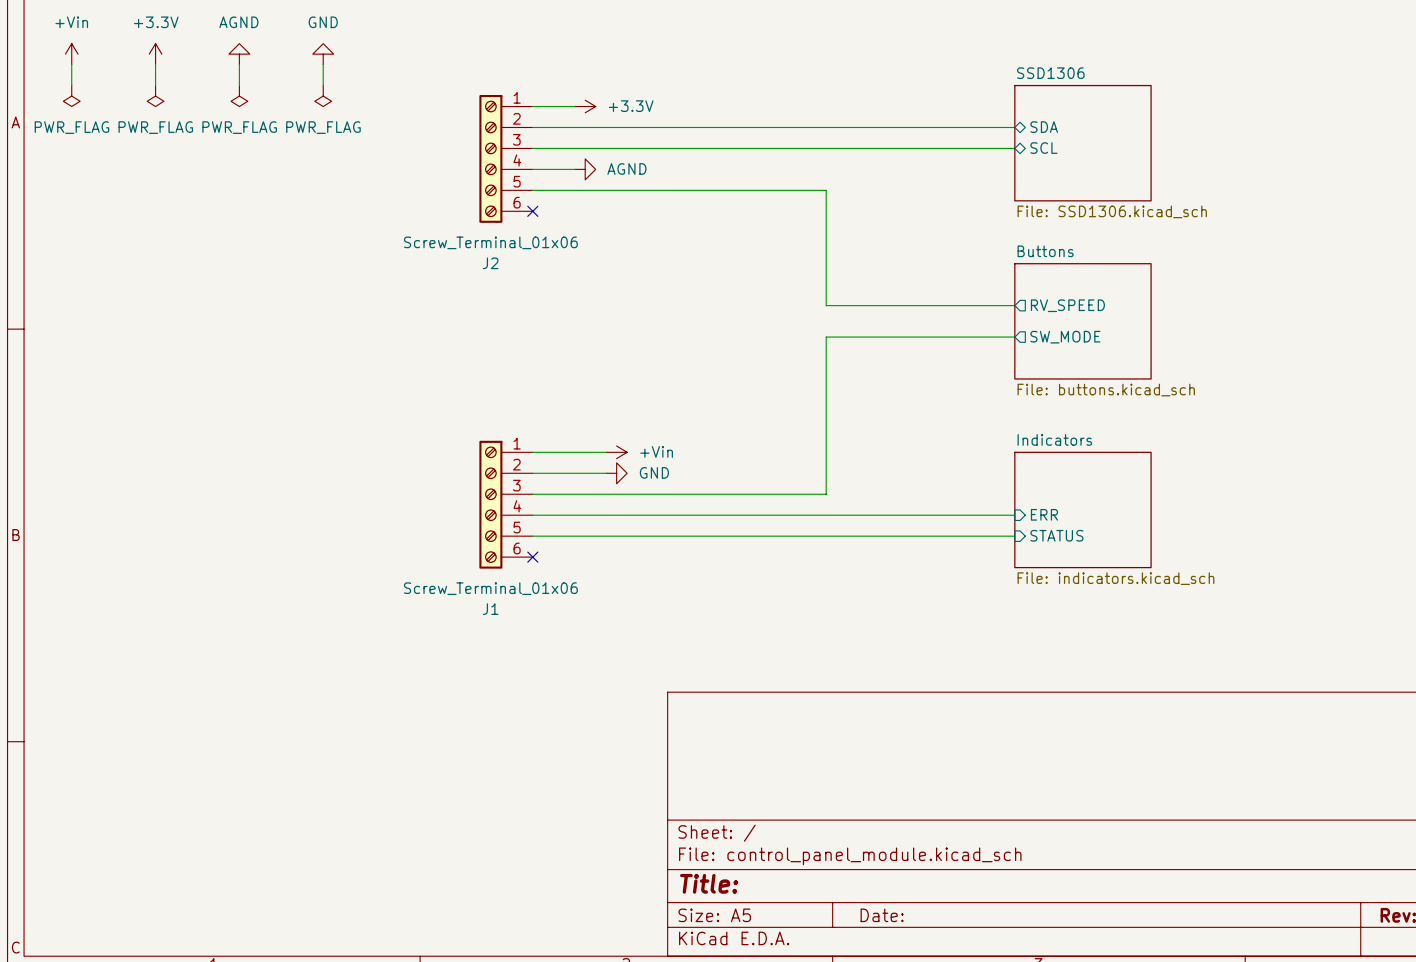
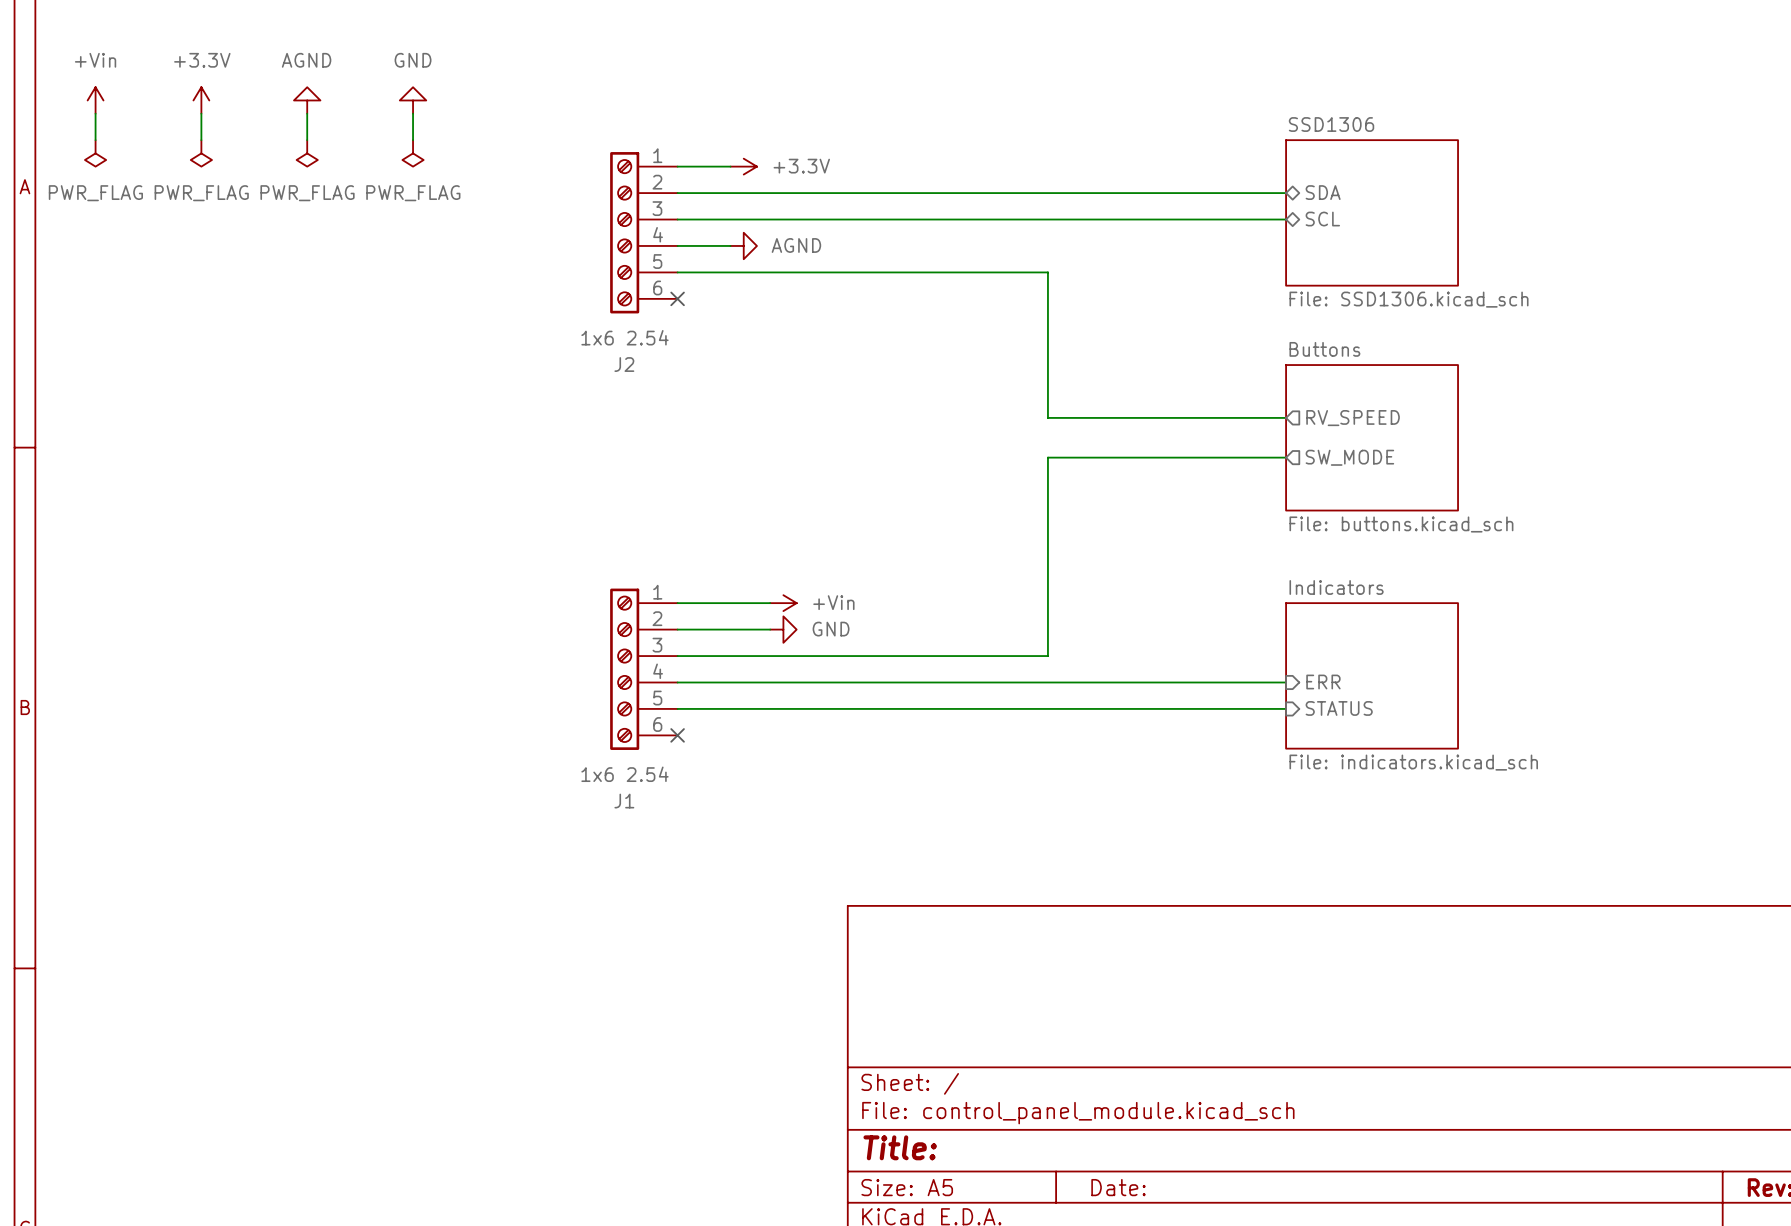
J2 value: Screw_Terminal_01x06 (490, 242) -> 1x6 2.54 (624, 337)
J1 value: Screw_Terminal_01x06 (490, 588) -> 1x6 2.54 (624, 774)

